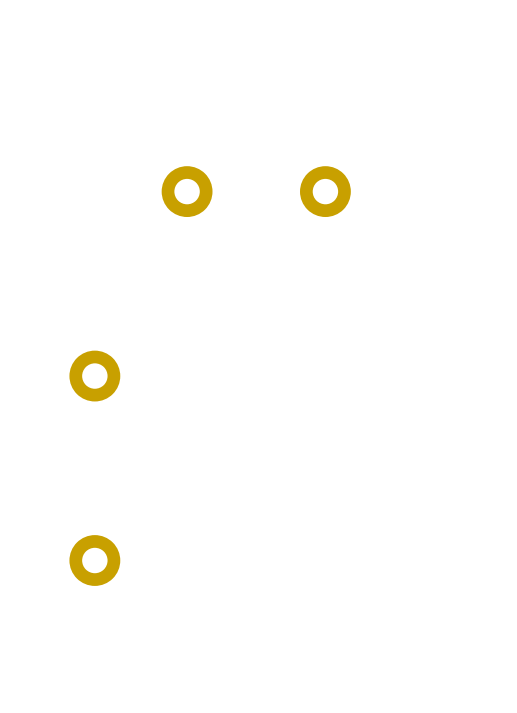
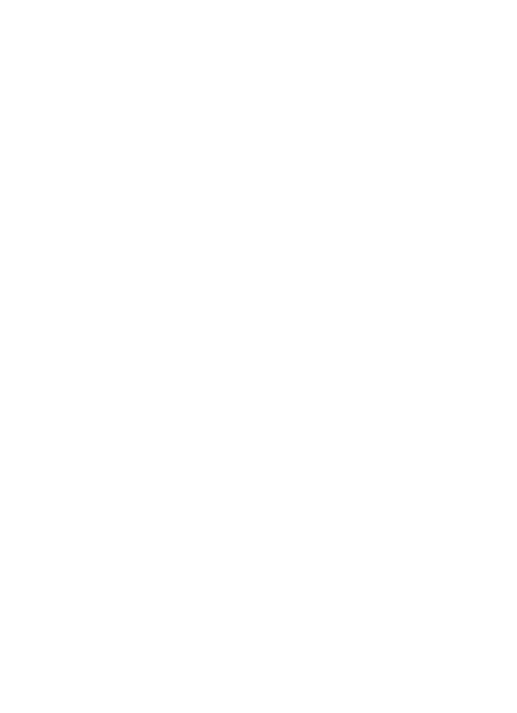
part: (187, 191) -> none
part: (325, 191) -> none
part: (94, 376) -> none
part: (94, 560) -> none

